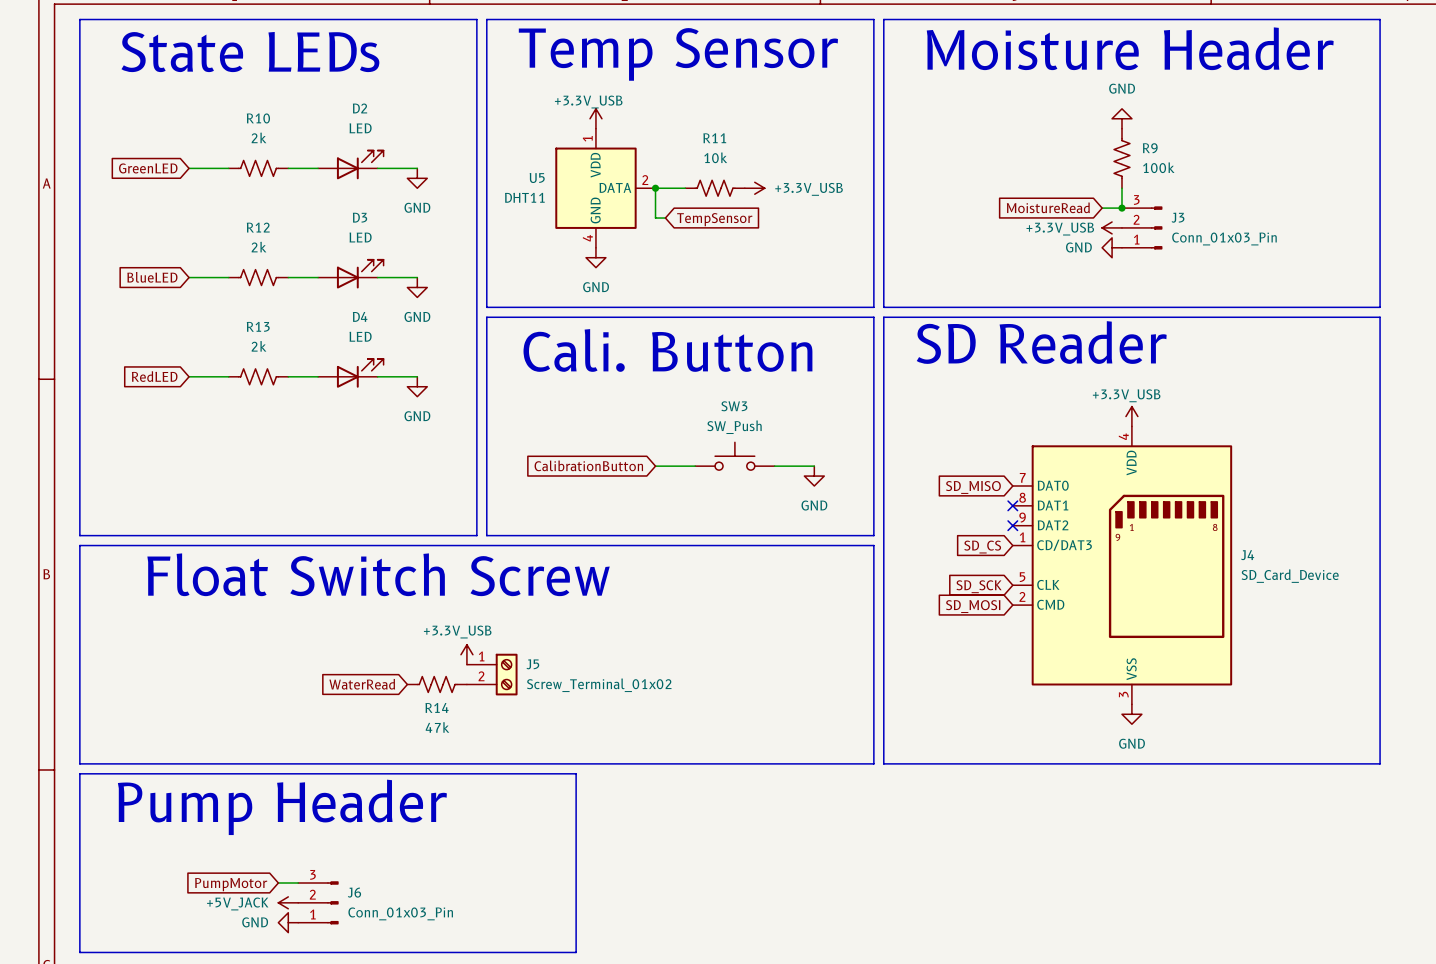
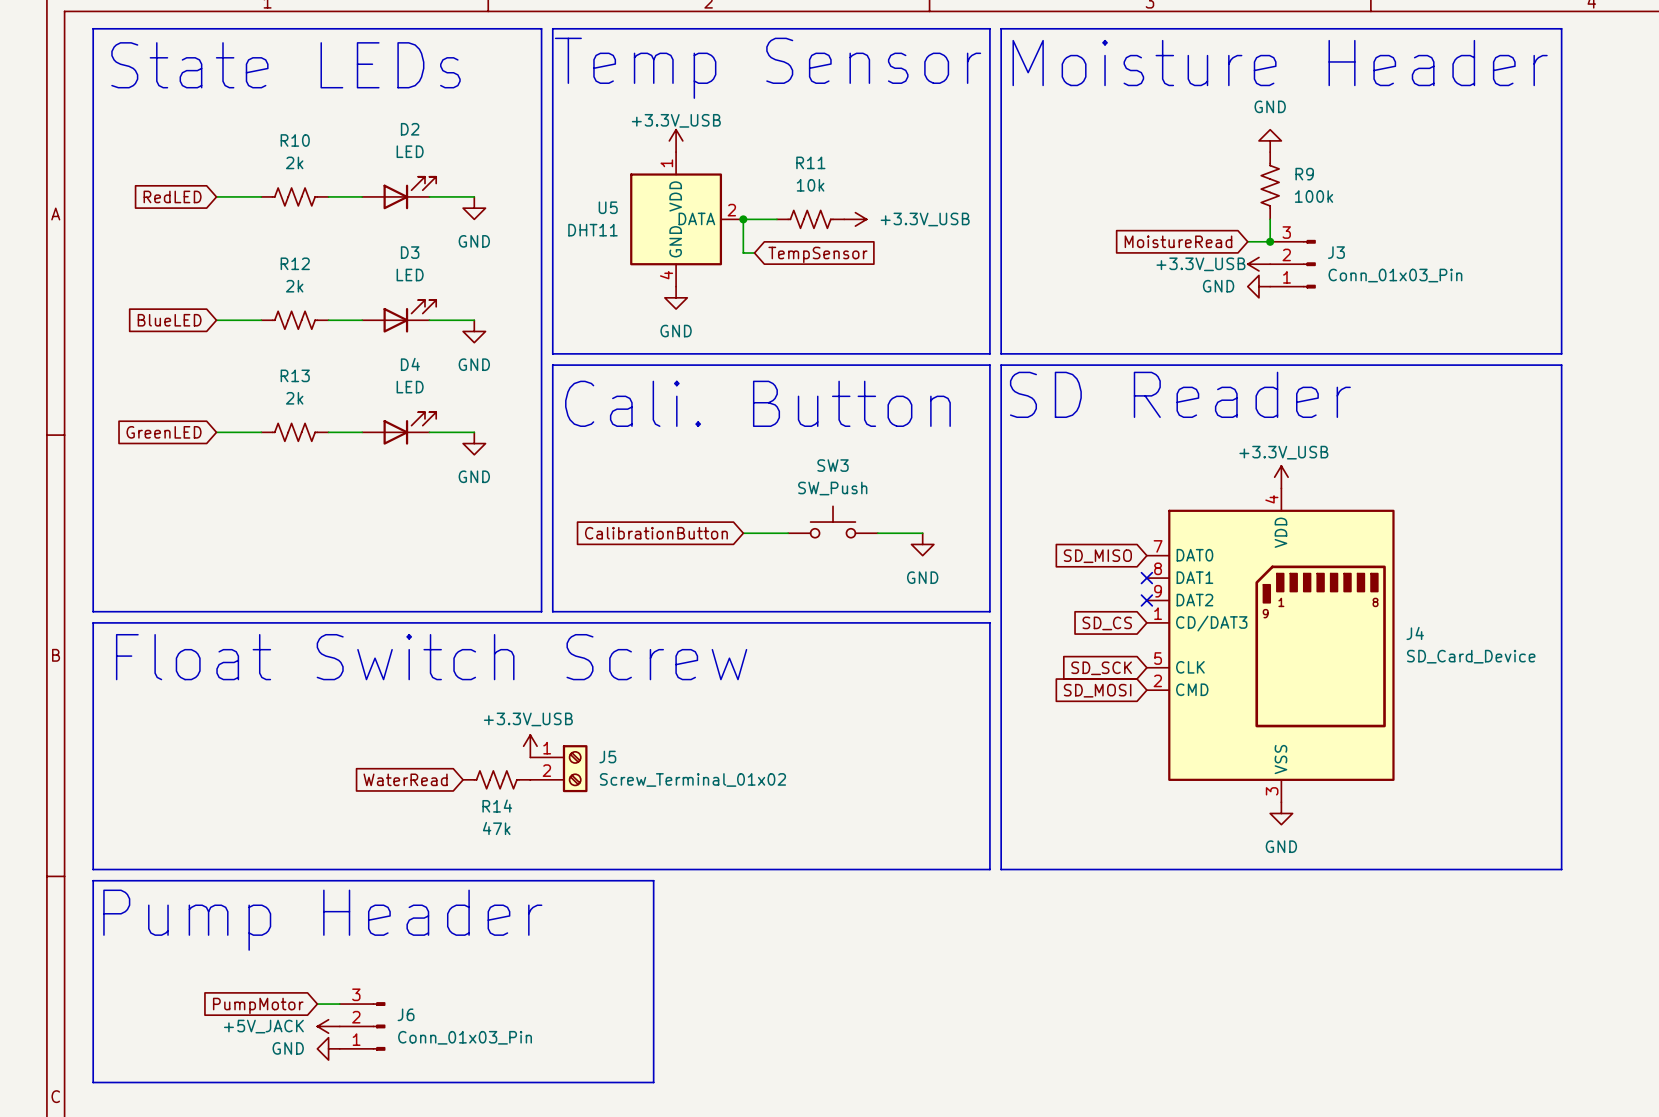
global label: GreenLED (148, 168) -> RedLED (172, 196)
global label: RedLED (154, 376) -> GreenLED (164, 432)

